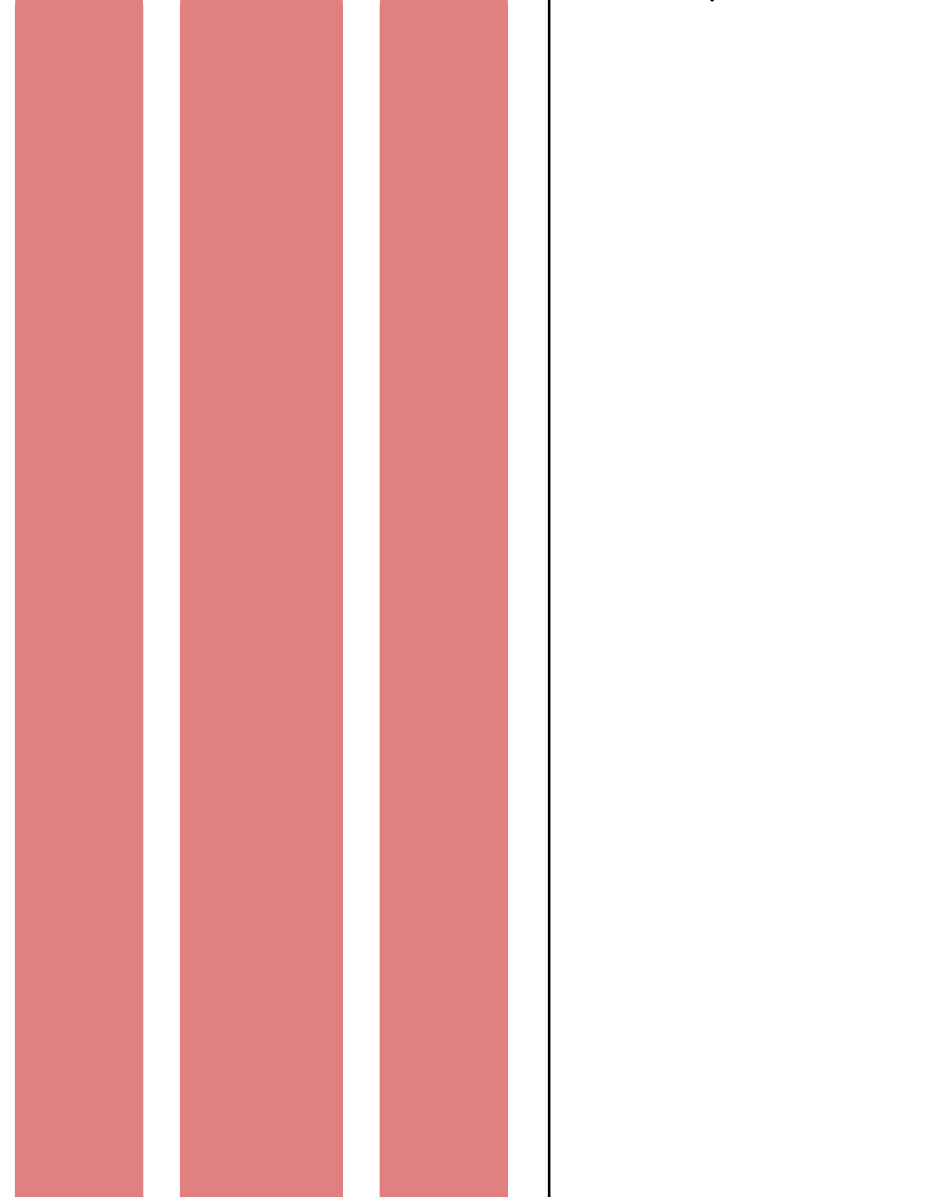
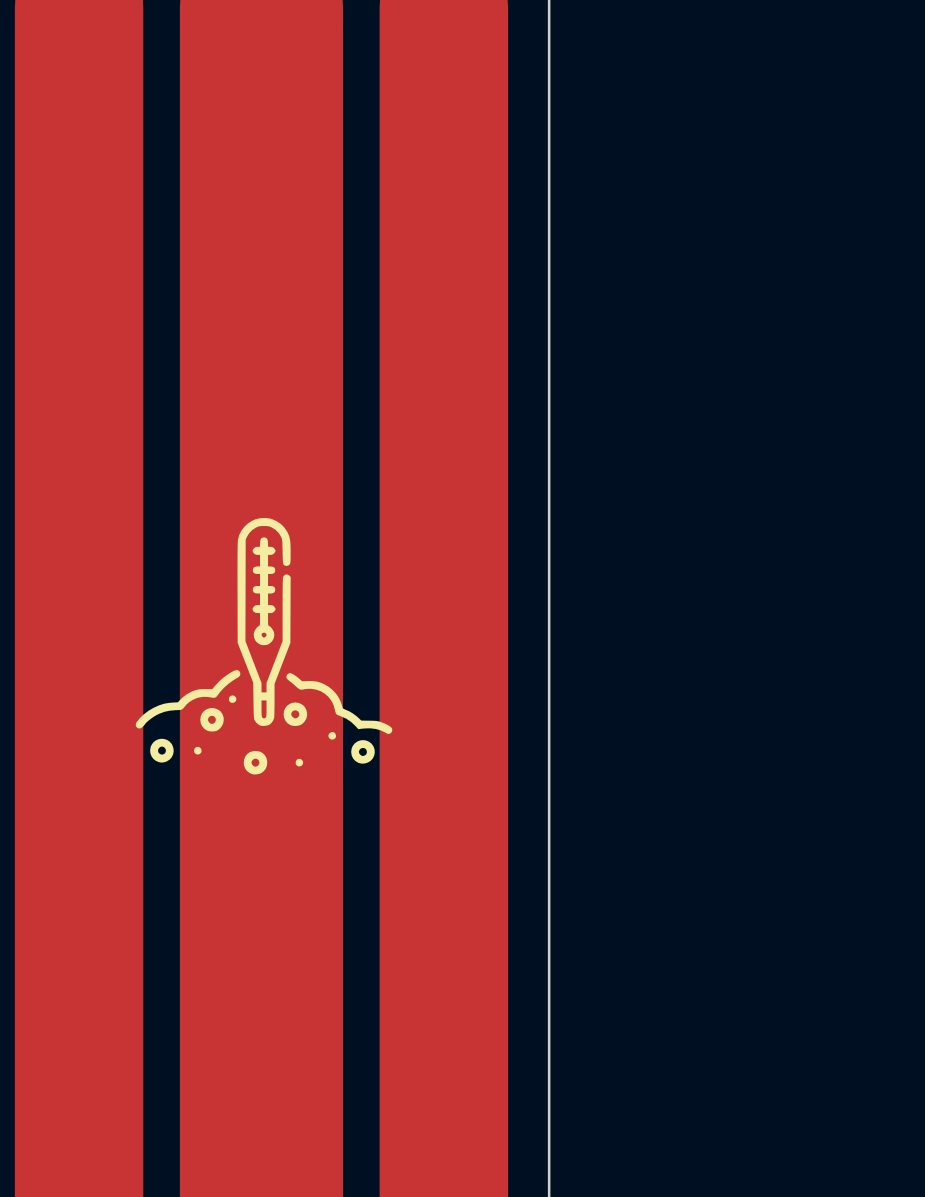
drawing: none -> [135, 518, 393, 775]

